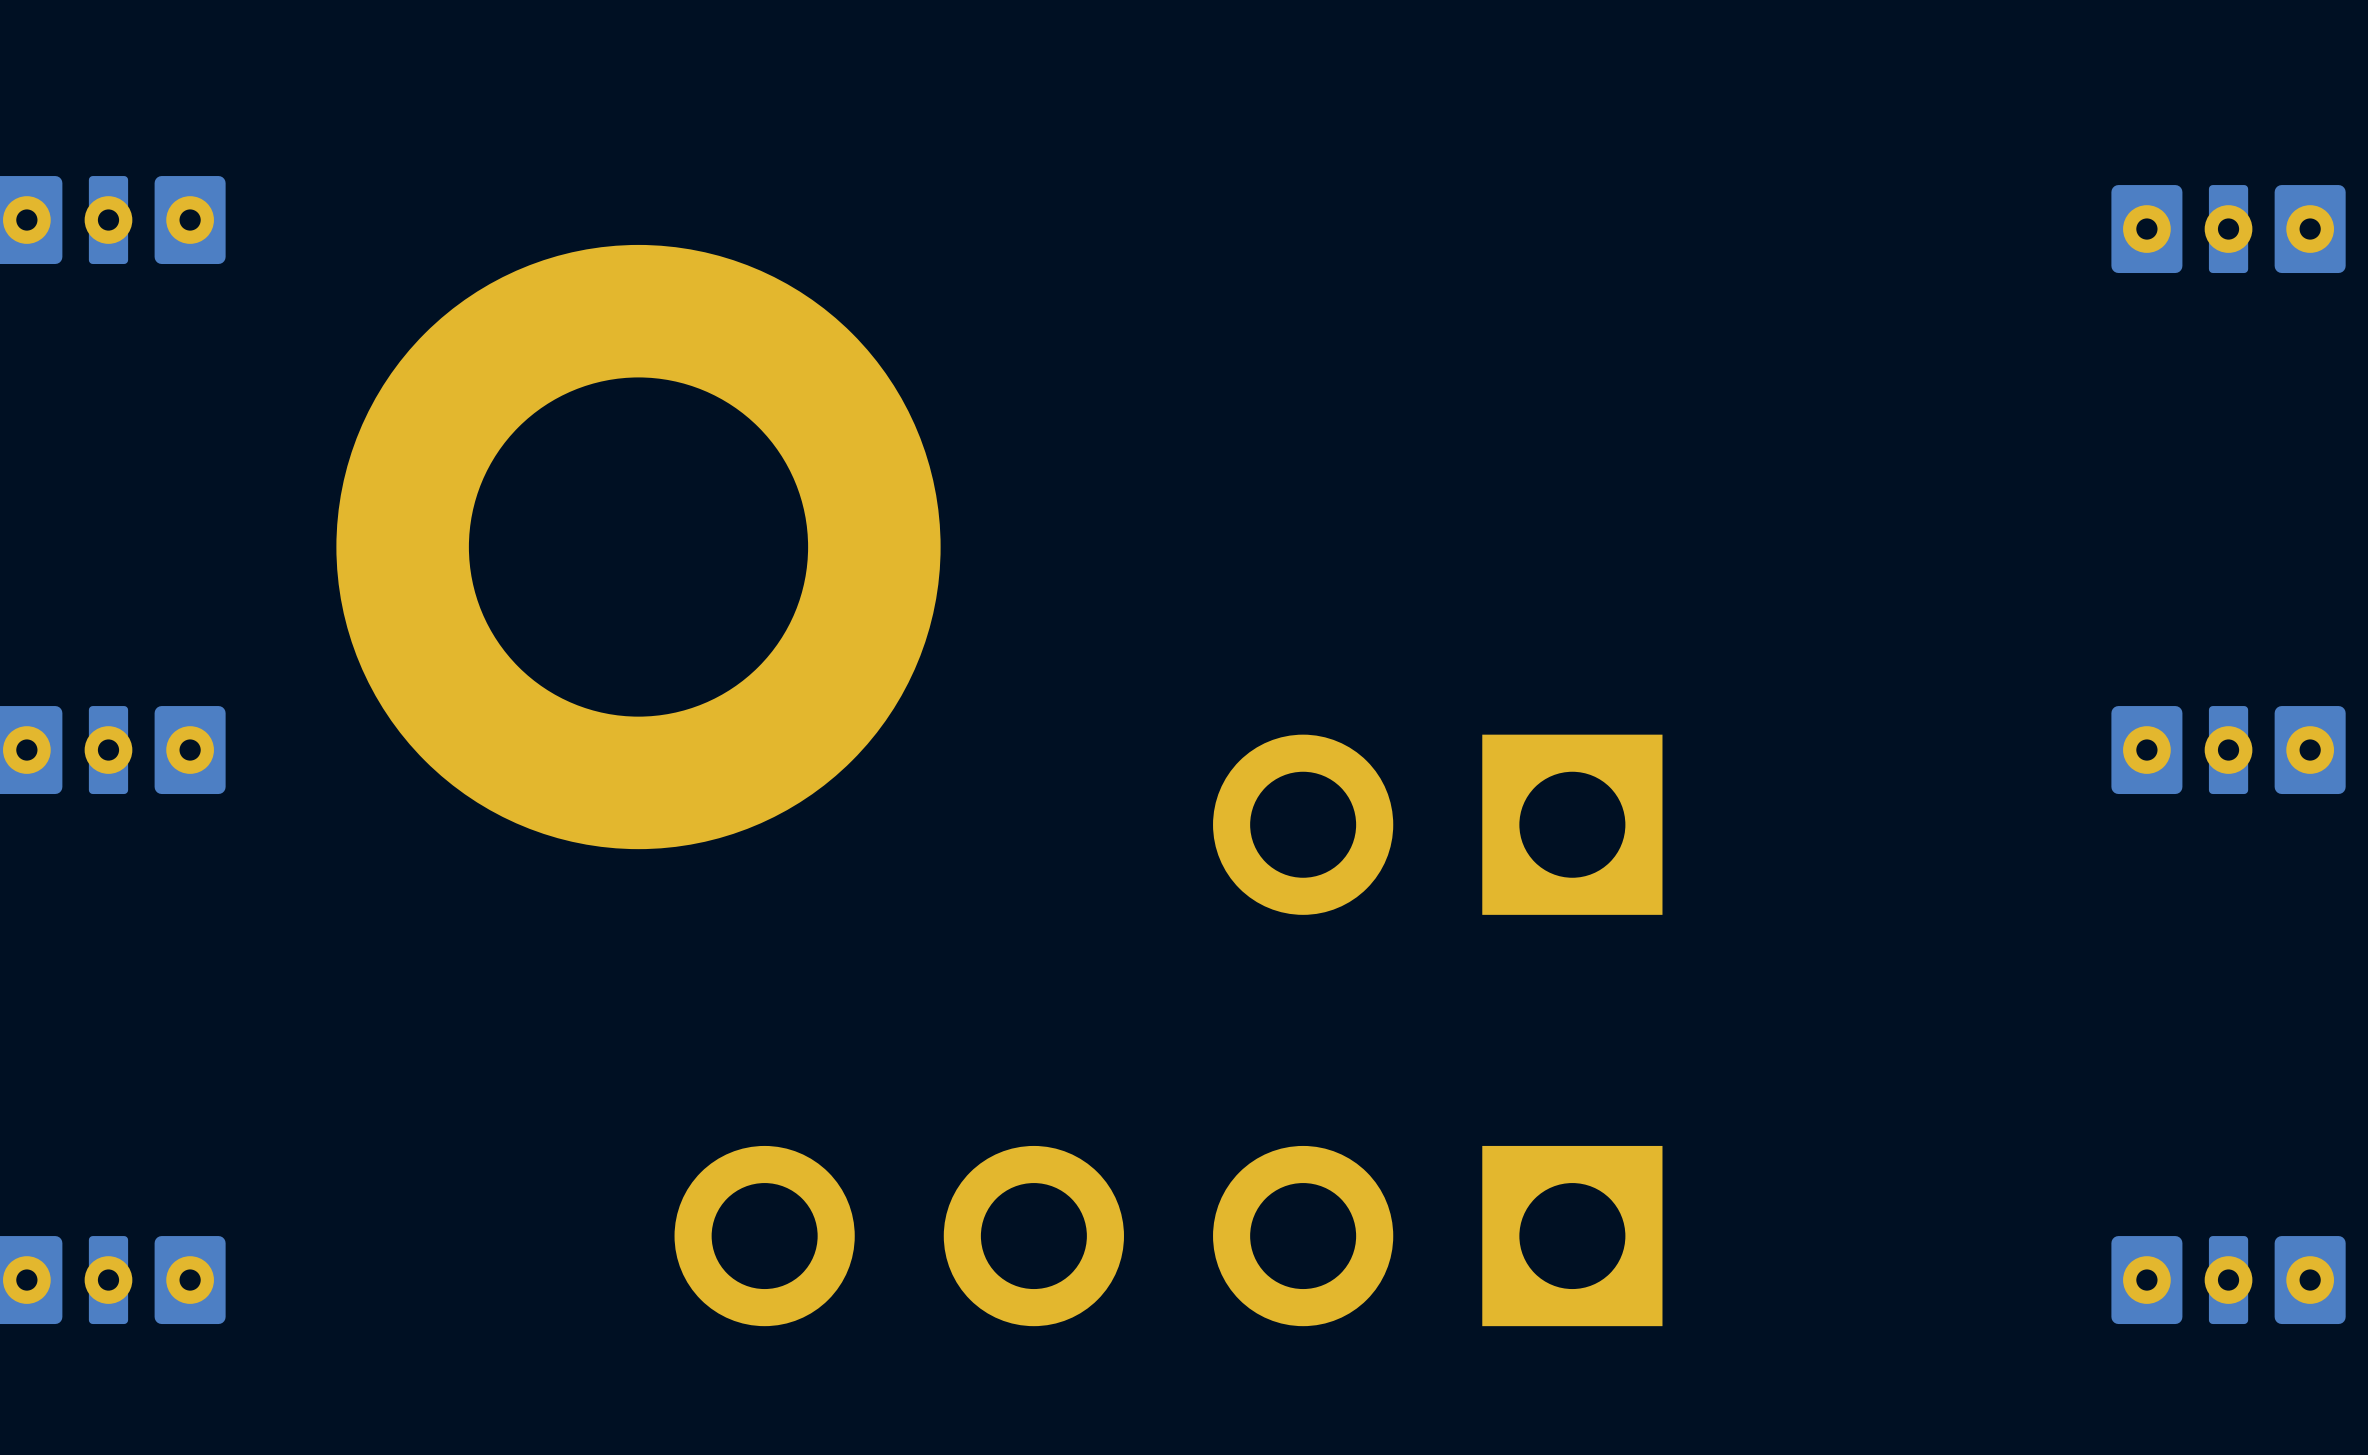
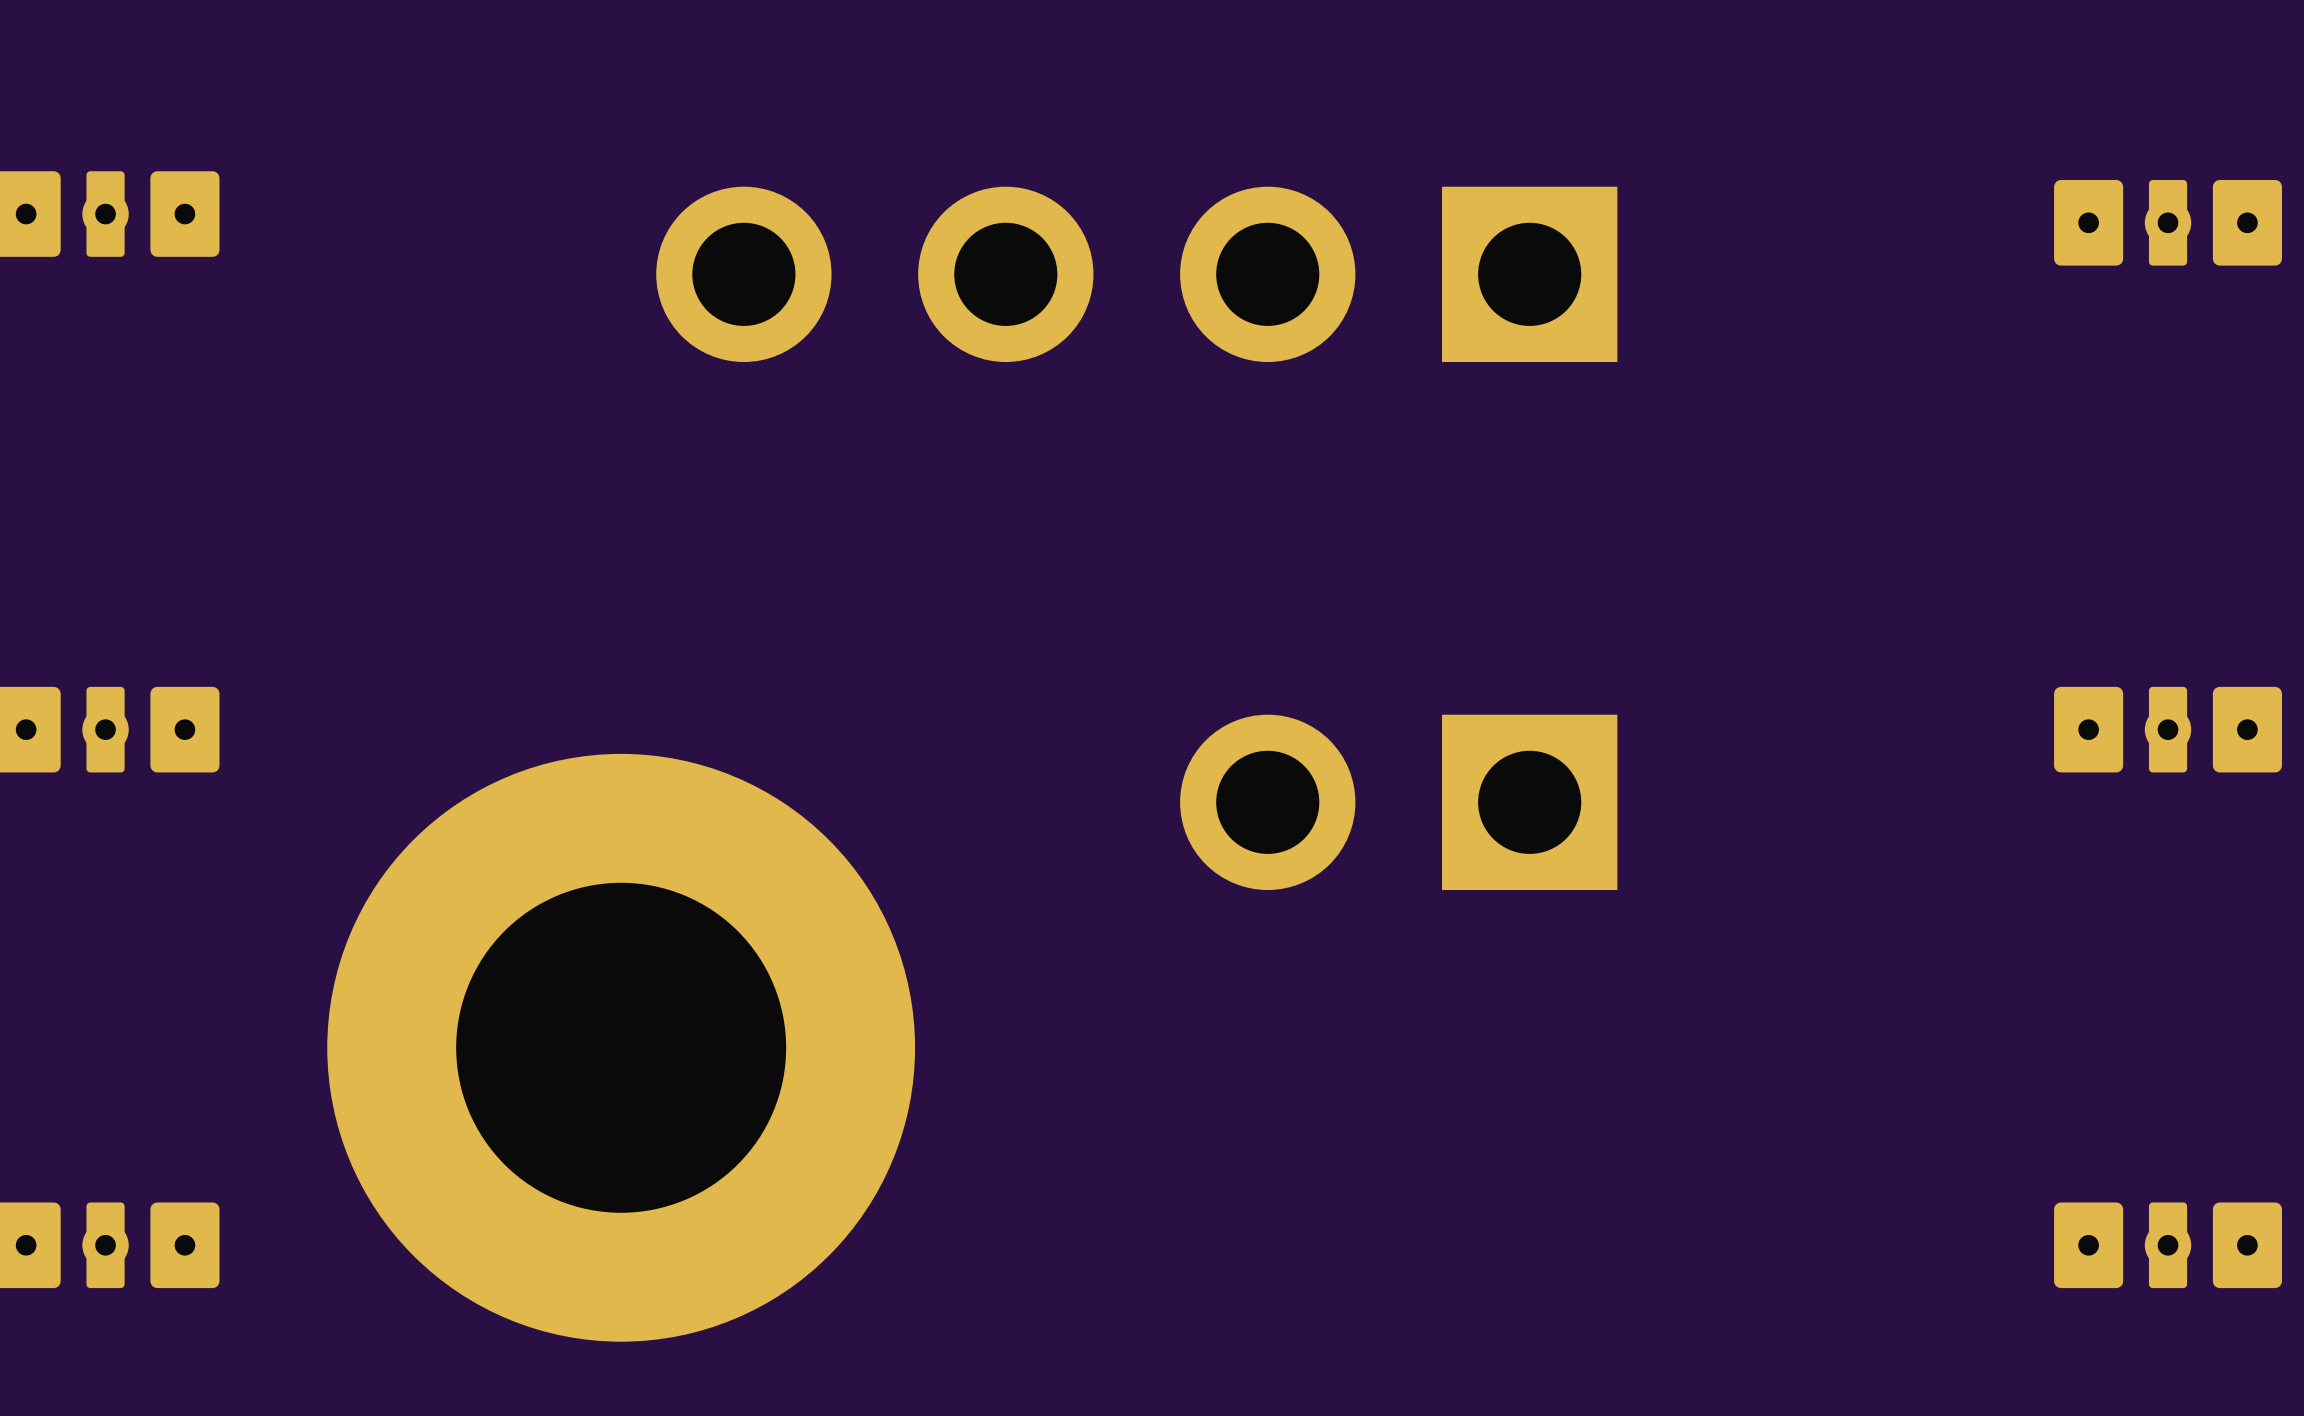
part position: (638, 547) -> (621, 1047)
part position: (1168, 1236) -> (1136, 274)

